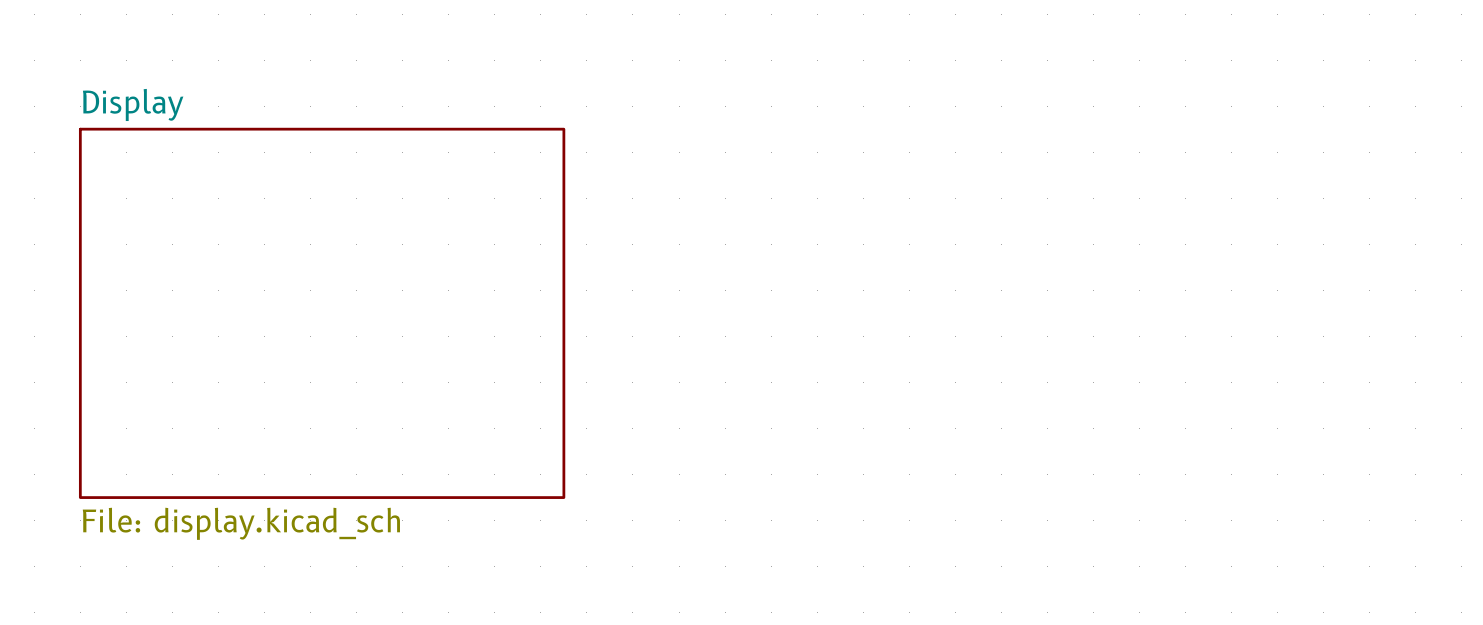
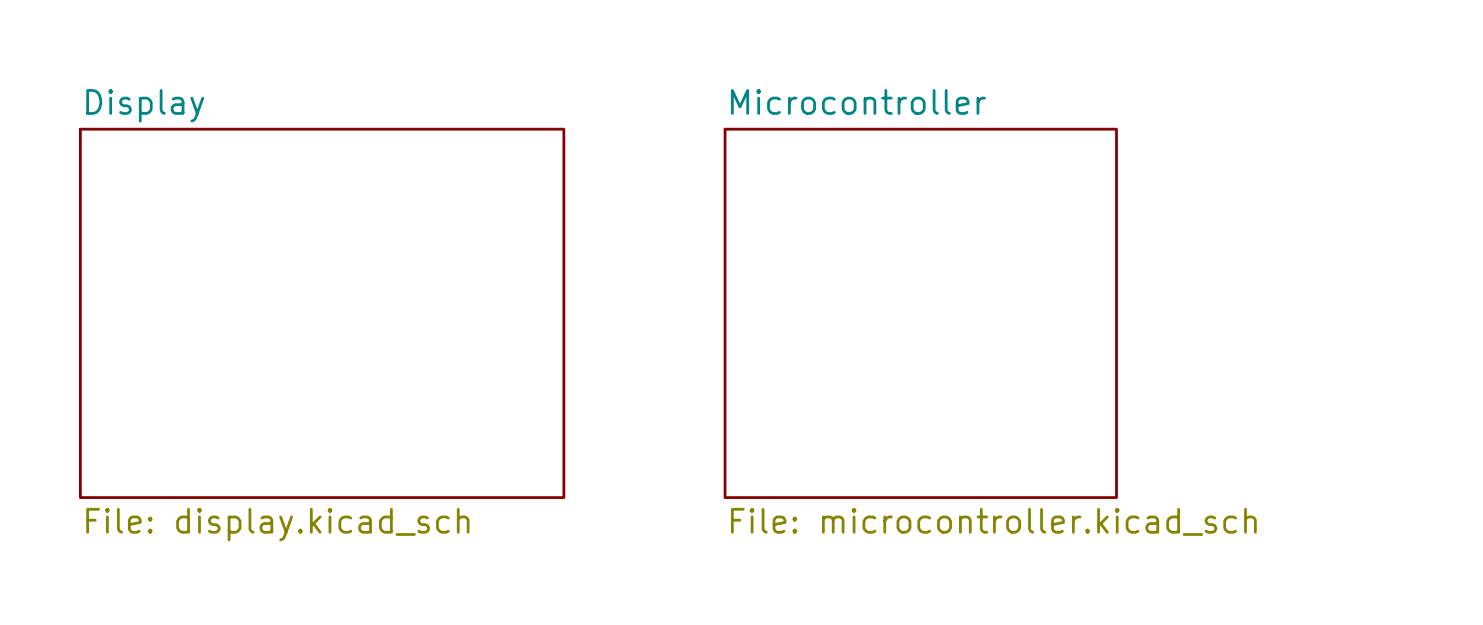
sheet Microcontroller: none -> File: microcontroller.kicad_sch (920, 313)

